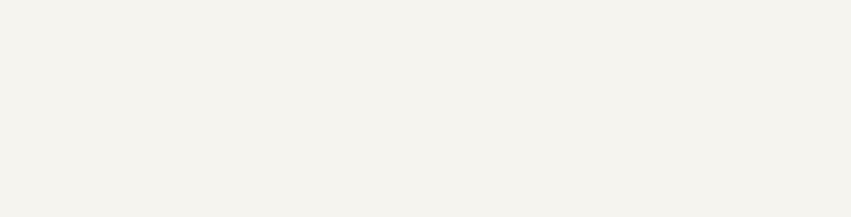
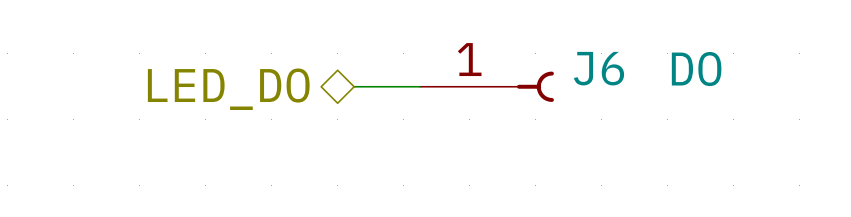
wire: none -> (354, 86) (420, 86)
J6: none -> DO (487, 86)
hierarchical label: none -> LED_DO (228, 89)

